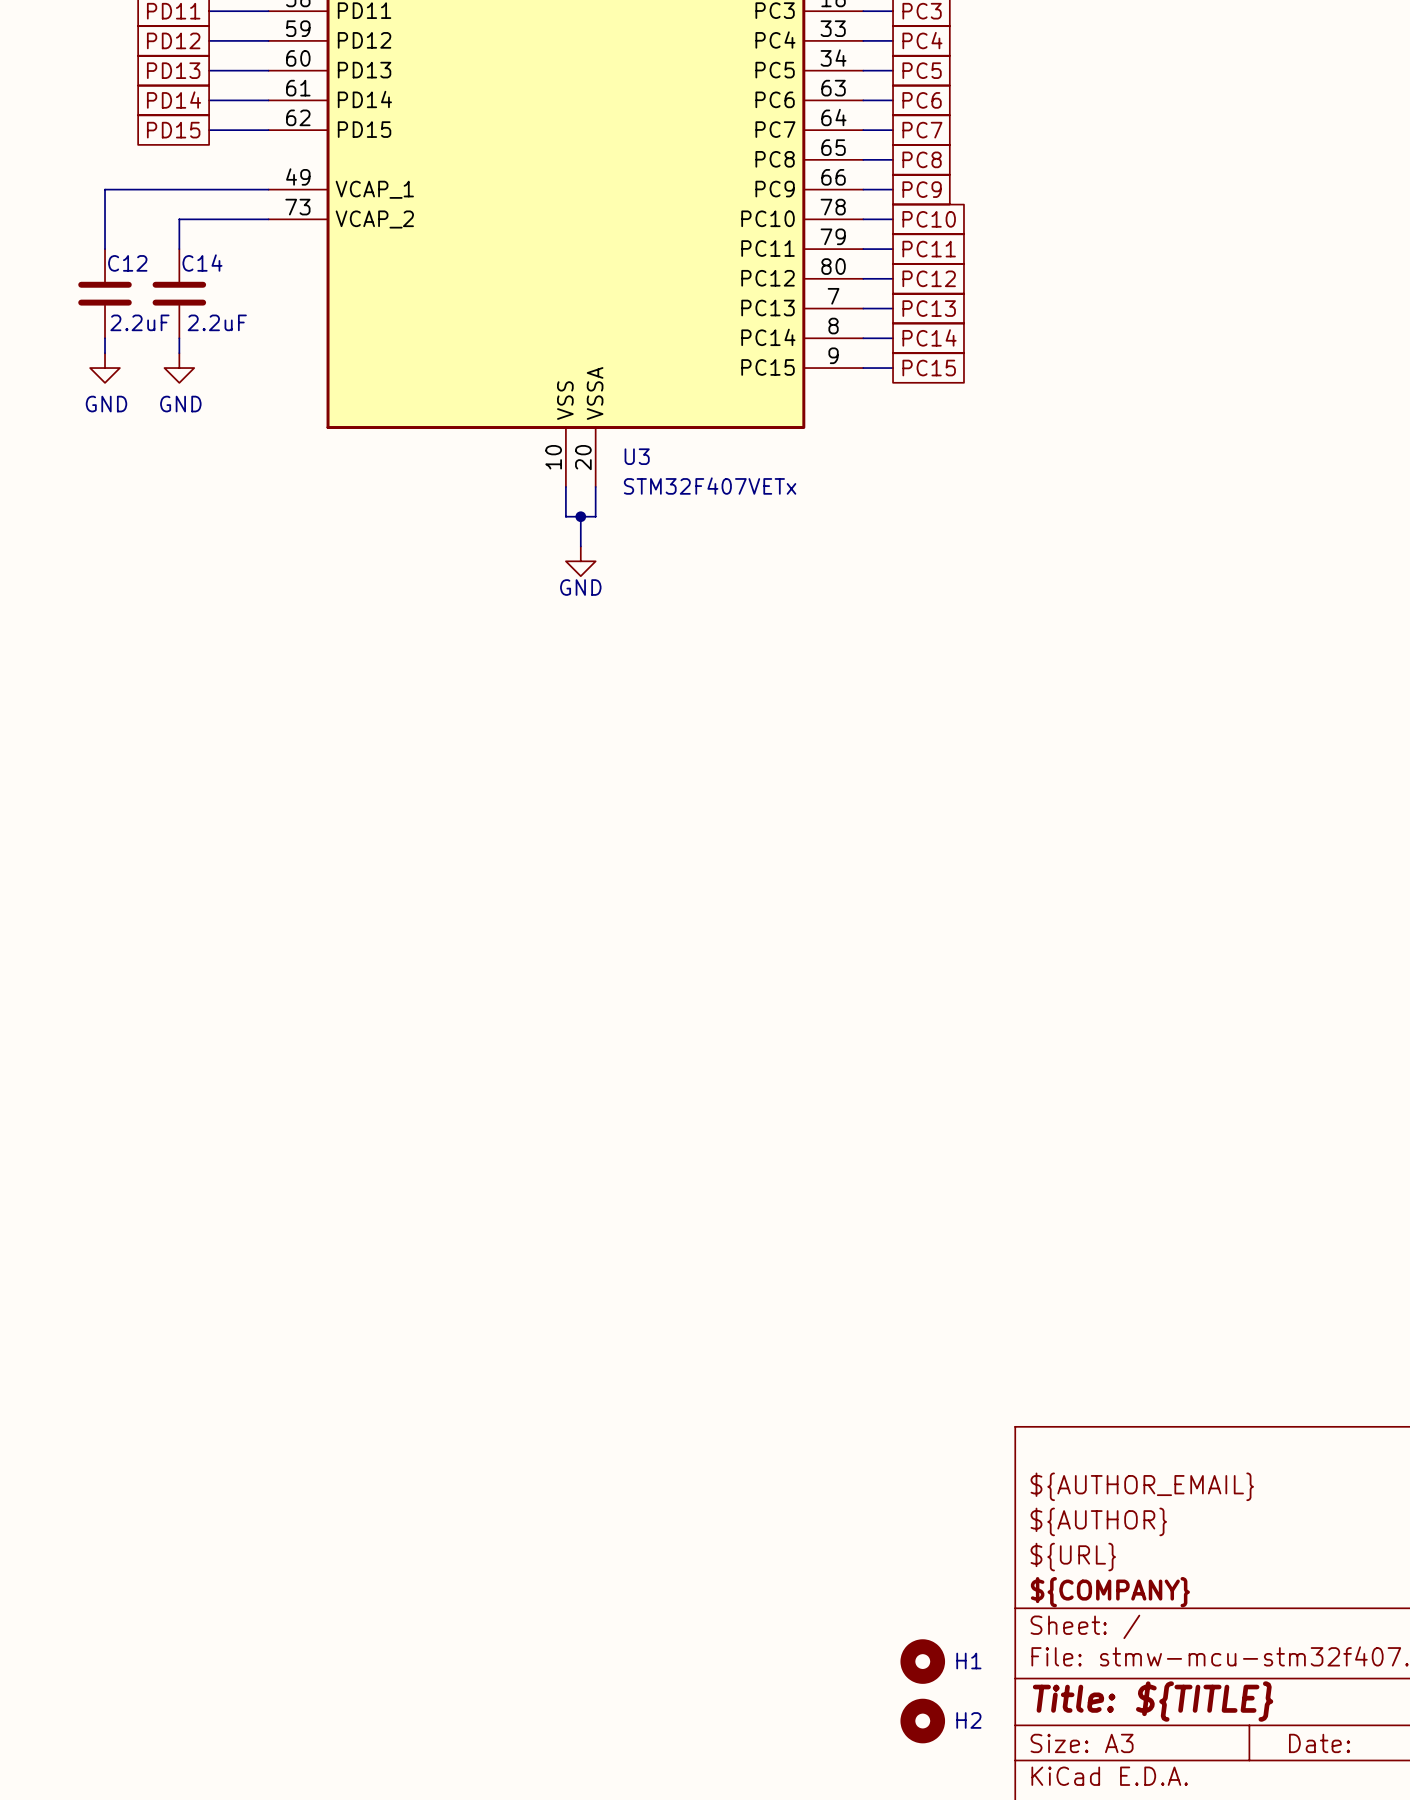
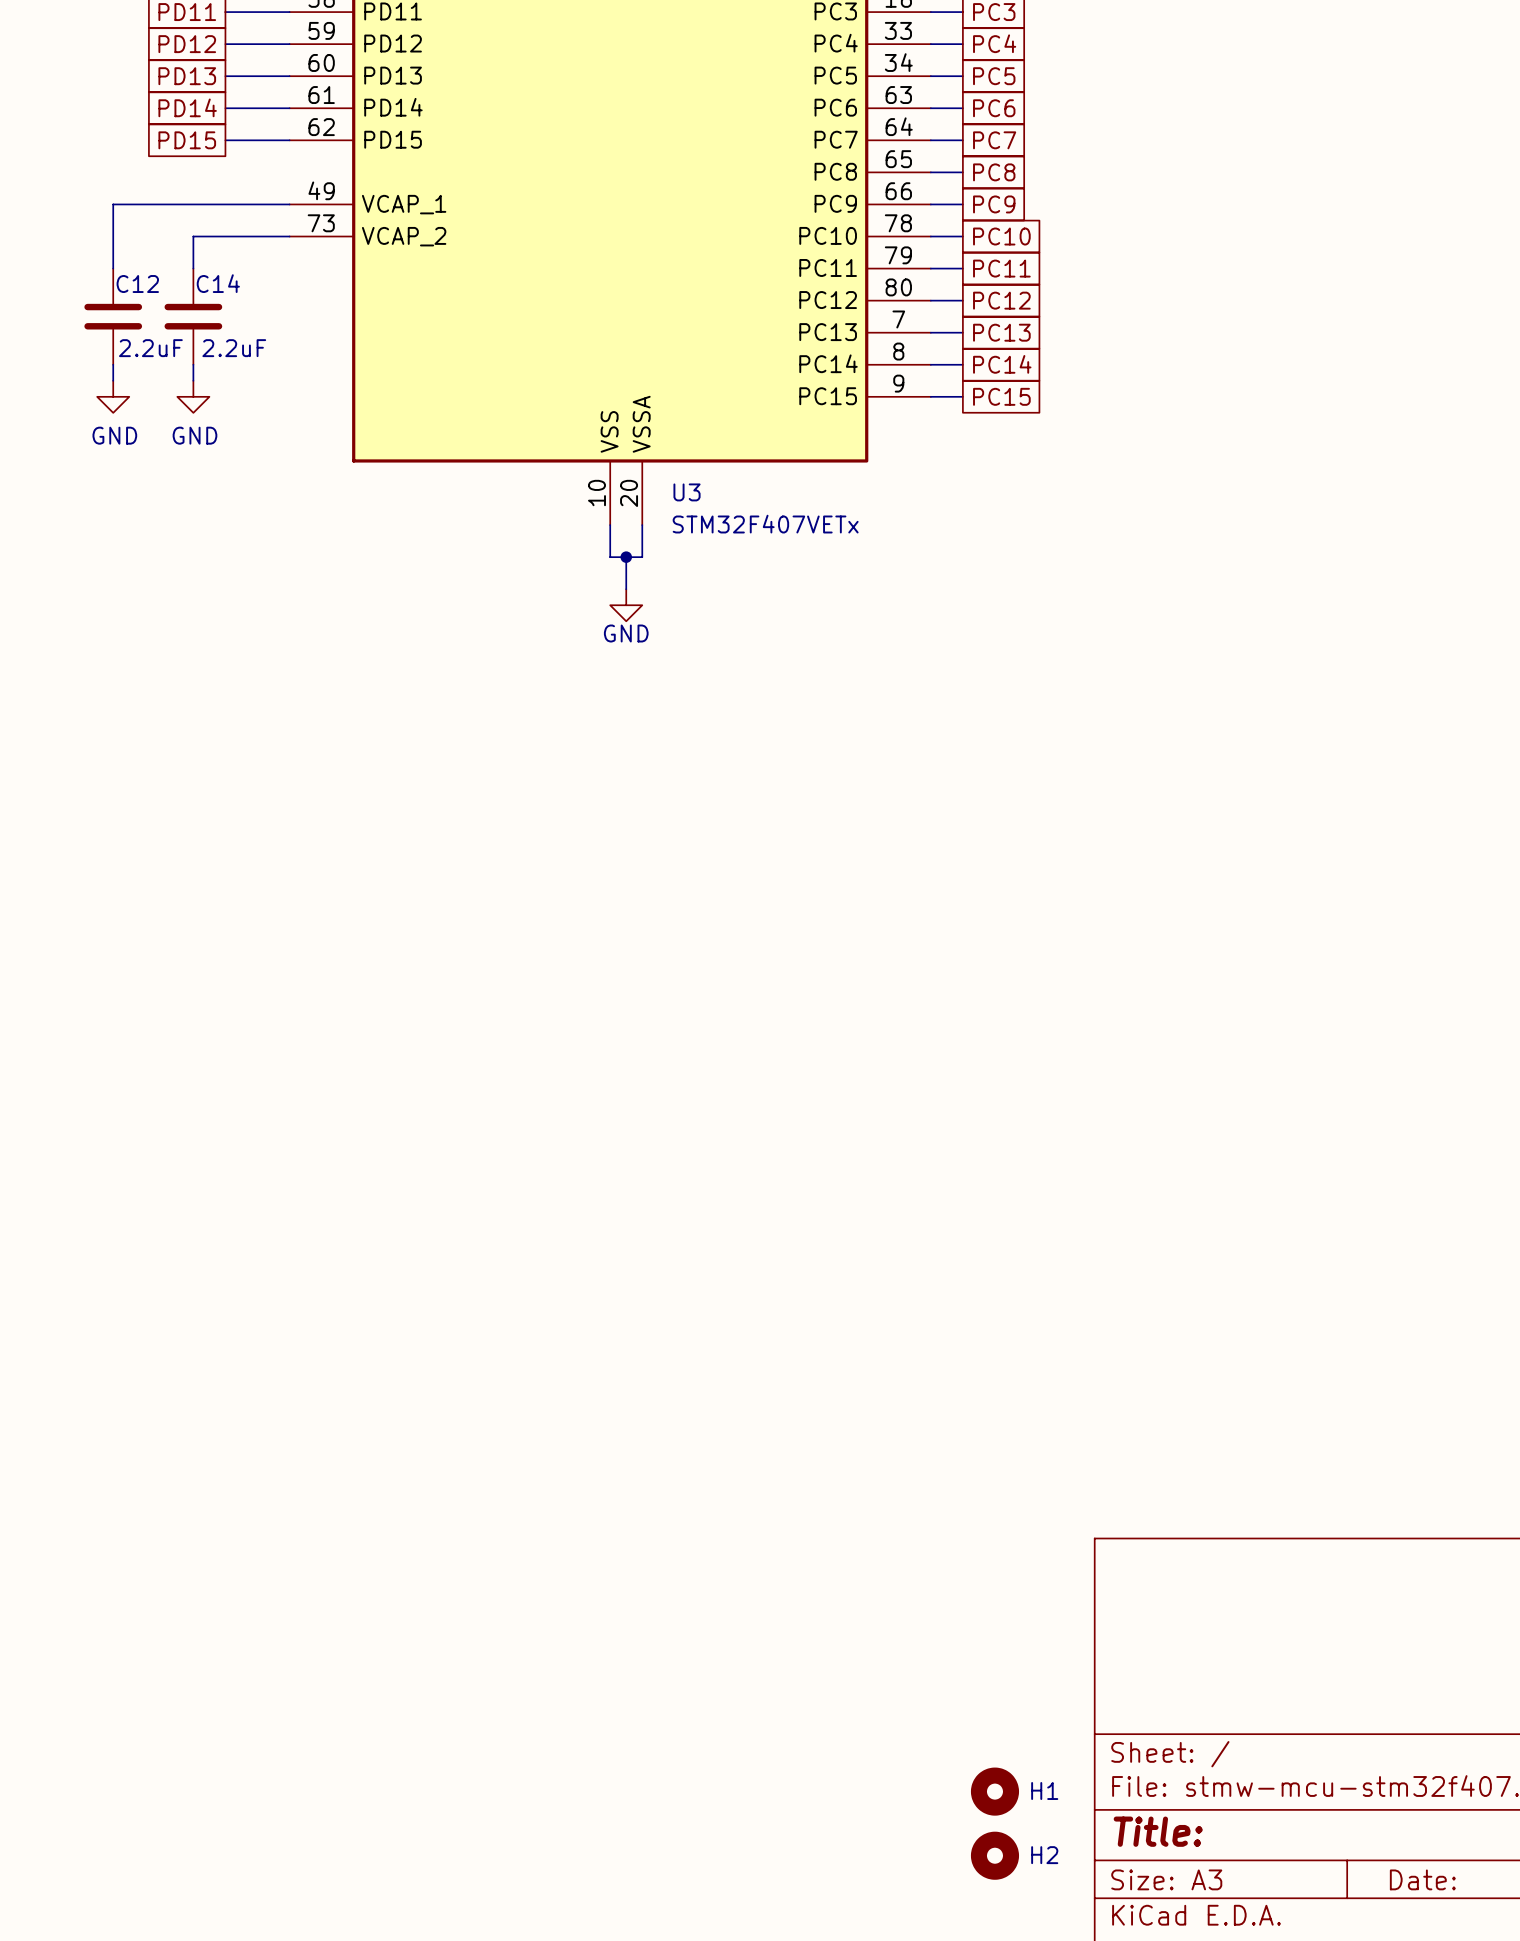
title block: ${AUTHOR_EMAIL} (1142, 1486) -> none
title block: ${AUTHOR} (1098, 1521) -> none
title block: ${URL} (1073, 1557) -> none
title block: ${COMPANY} (1110, 1592) -> none
title block: Title: ${TITLE} (1153, 1701) -> Title: (1158, 1831)

